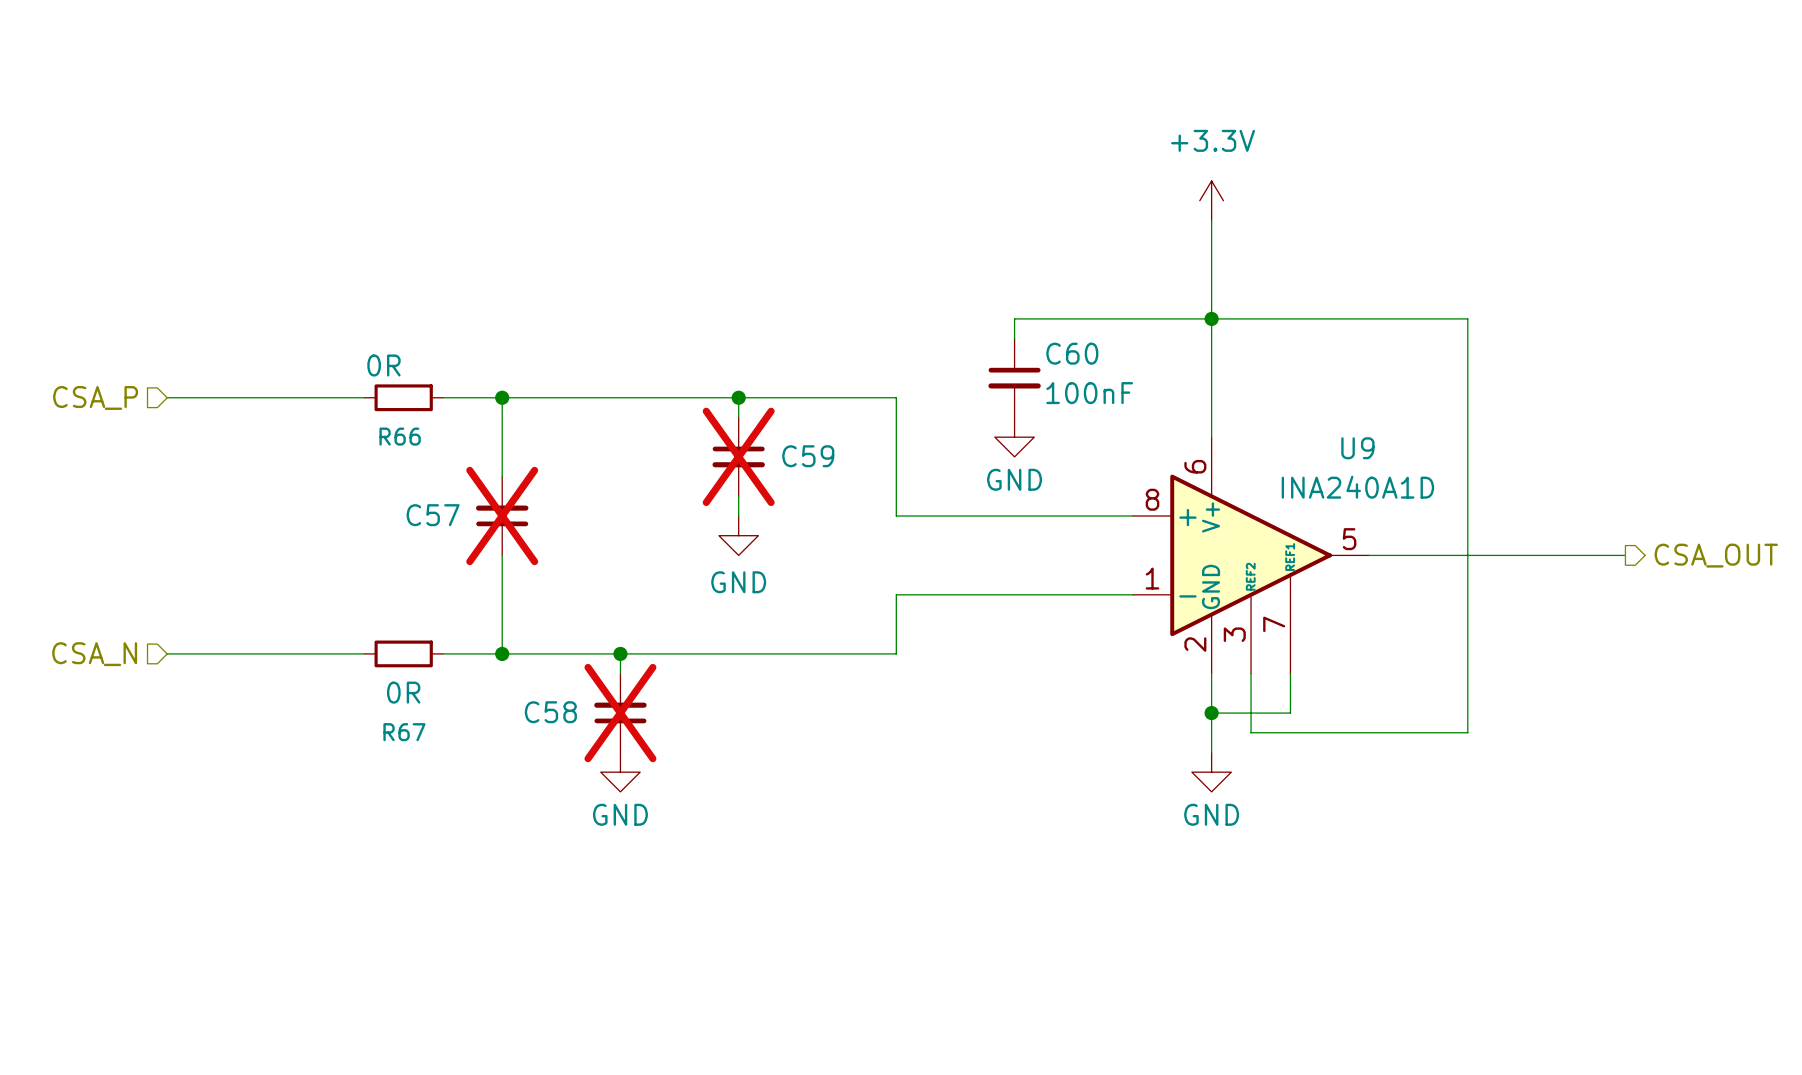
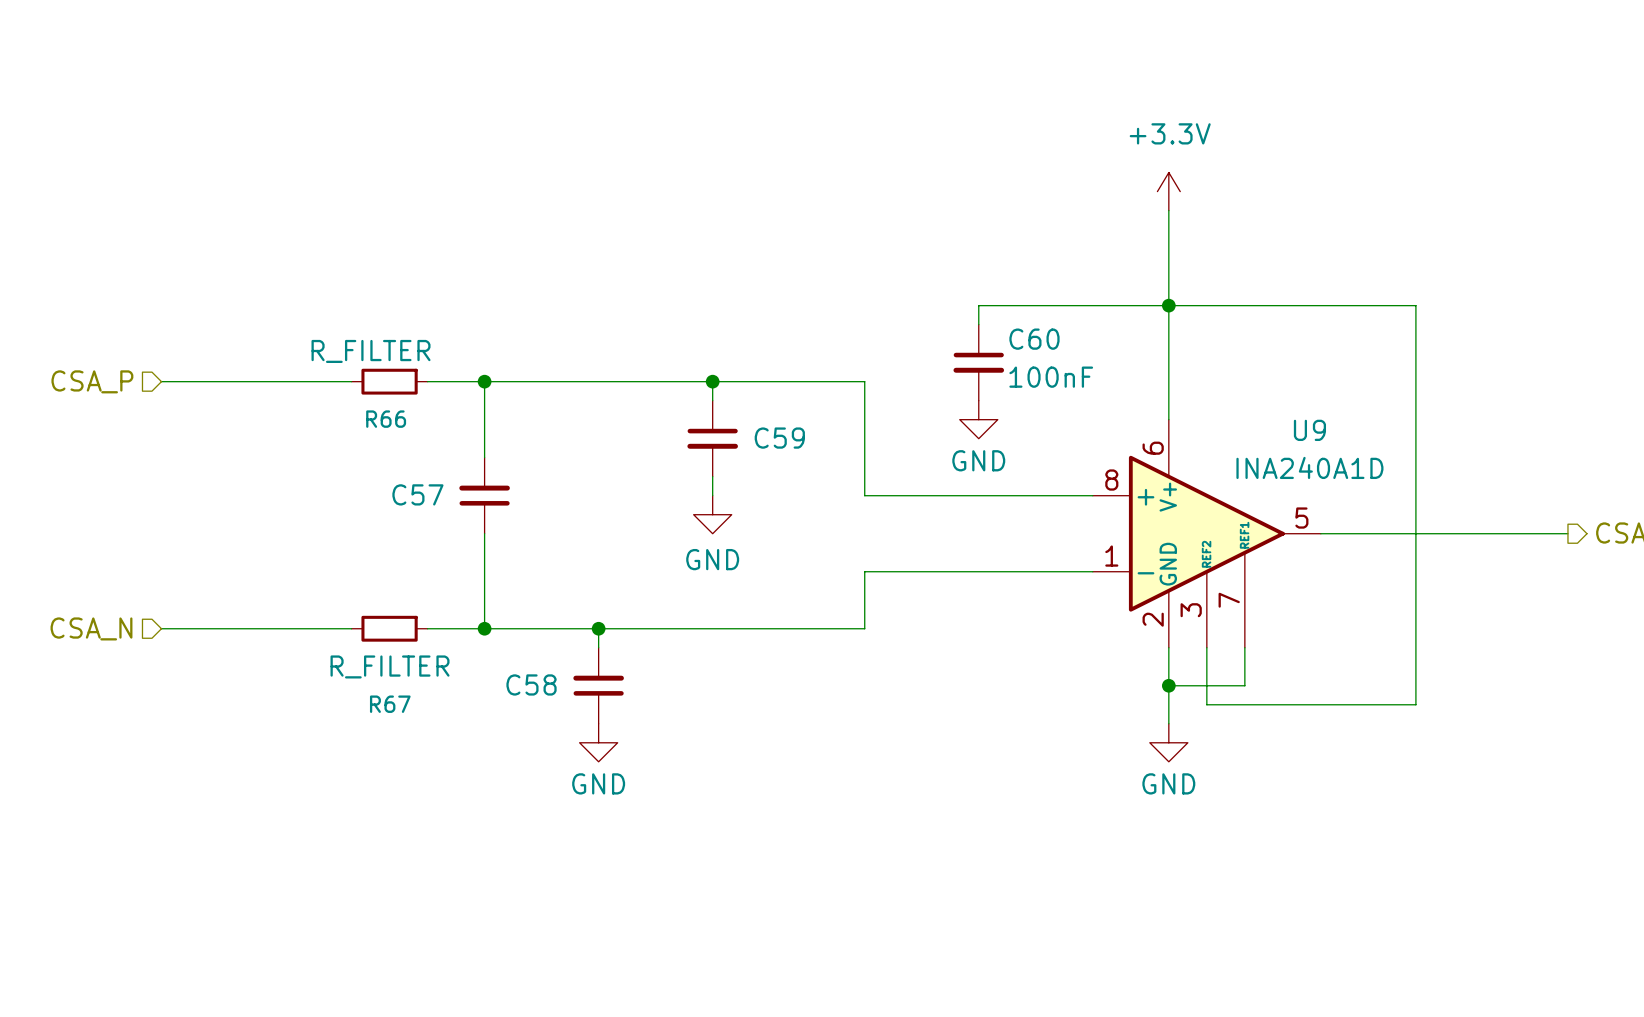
R66 value: 0R (383, 365) -> R_FILTER (371, 351)
C59 do-not-place cross: (738, 456) -> none
C57 do-not-place cross: (502, 516) -> none
R67 value: 0R (403, 692) -> R_FILTER (390, 666)
C58 do-not-place cross: (620, 713) -> none

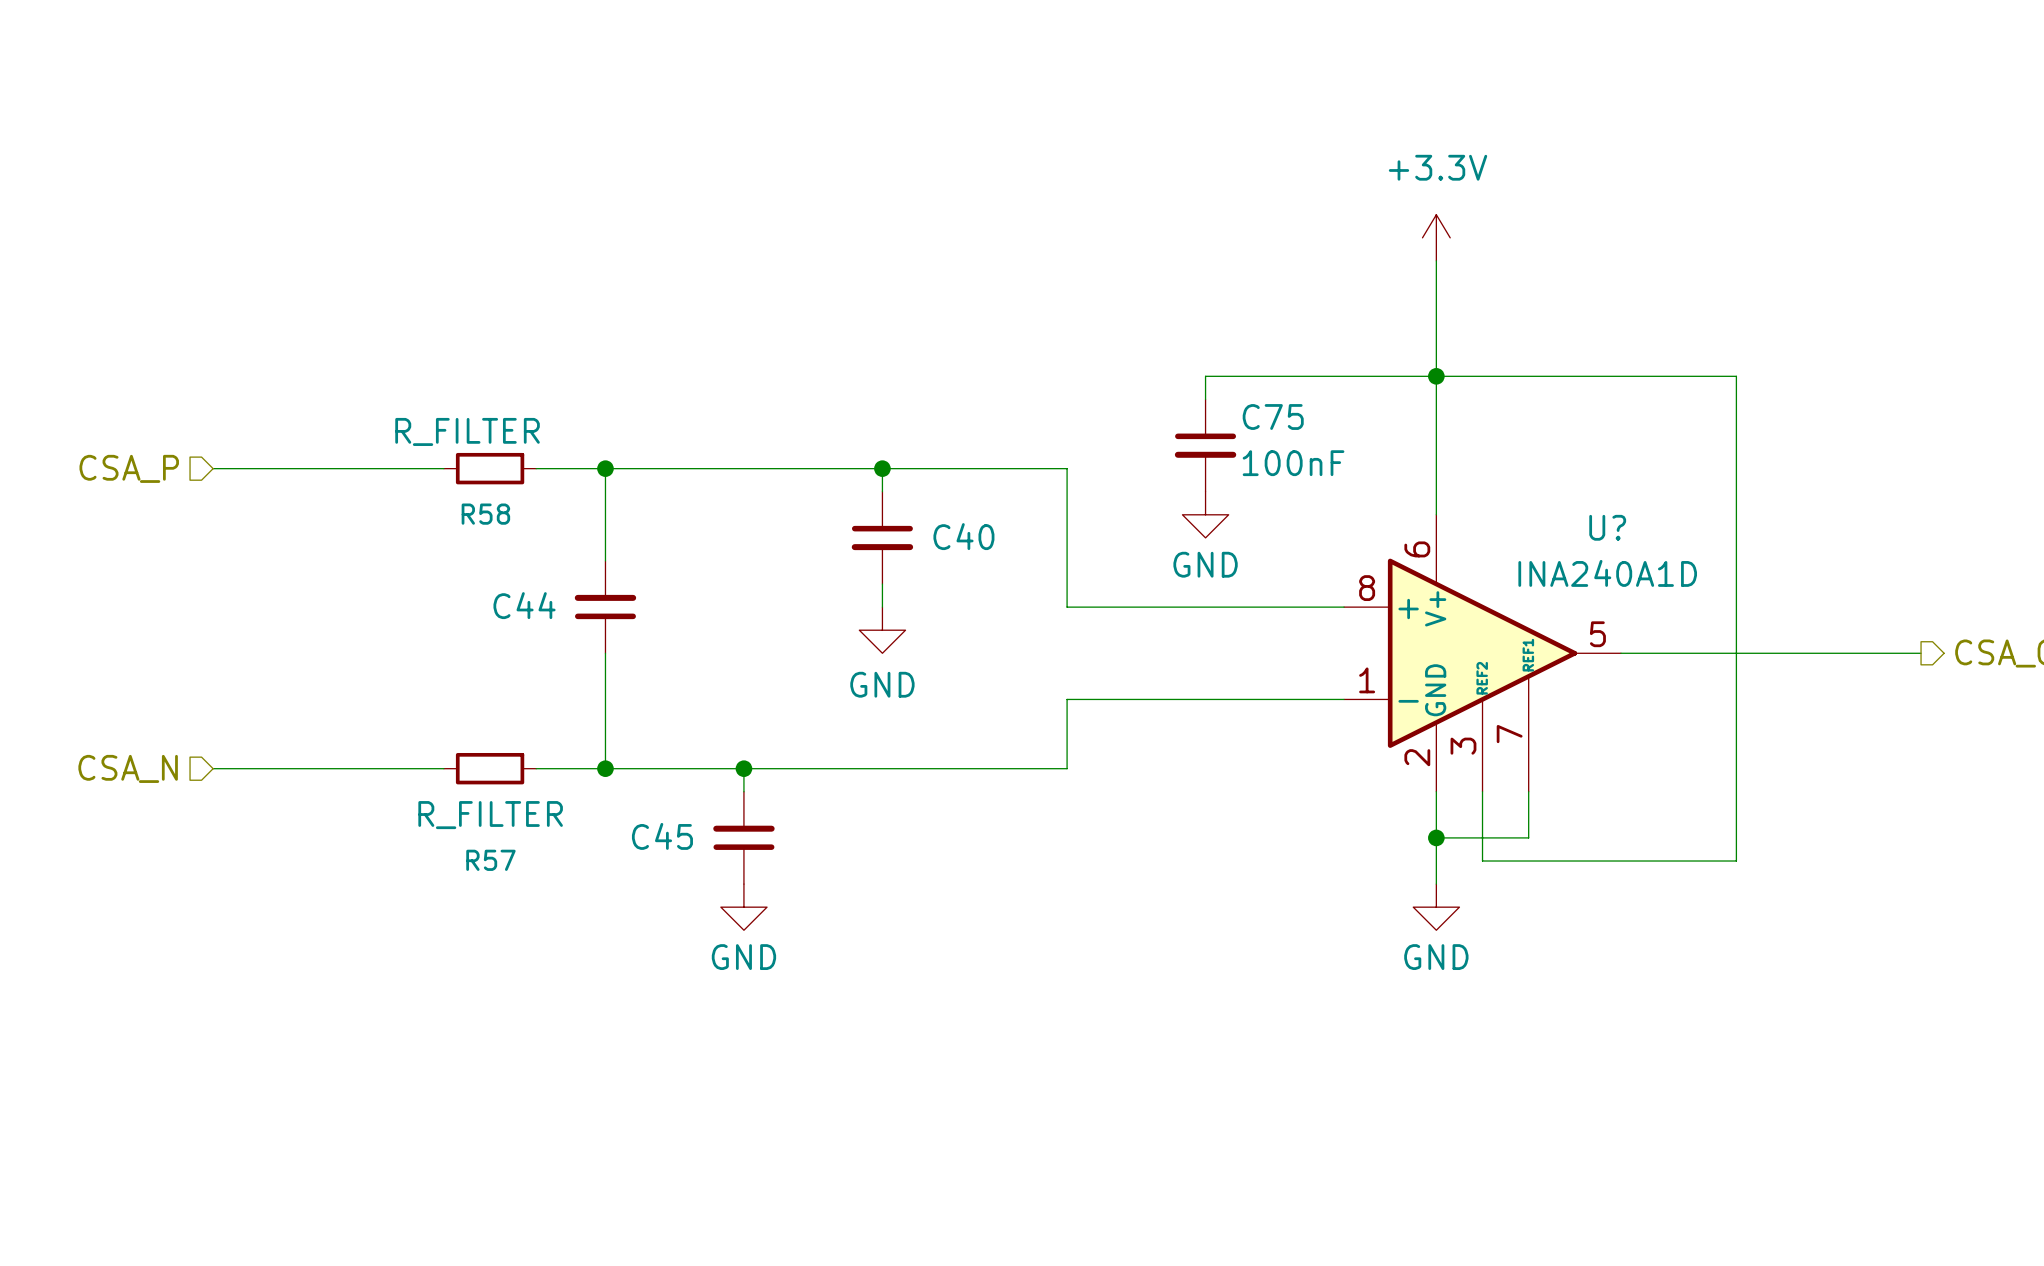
C60 name: C60 (1034, 339) -> C75 (1273, 417)
R66 name: R66 (386, 419) -> R58 (485, 514)
U9 name: U9 (1309, 430) -> U? (1607, 527)
C59 name: C59 (779, 438) -> C40 (963, 536)
C57 name: C57 (417, 494) -> C44 (524, 605)
C58 name: C58 (531, 684) -> C45 (662, 836)
R67 name: R67 (390, 704) -> R57 (490, 860)

